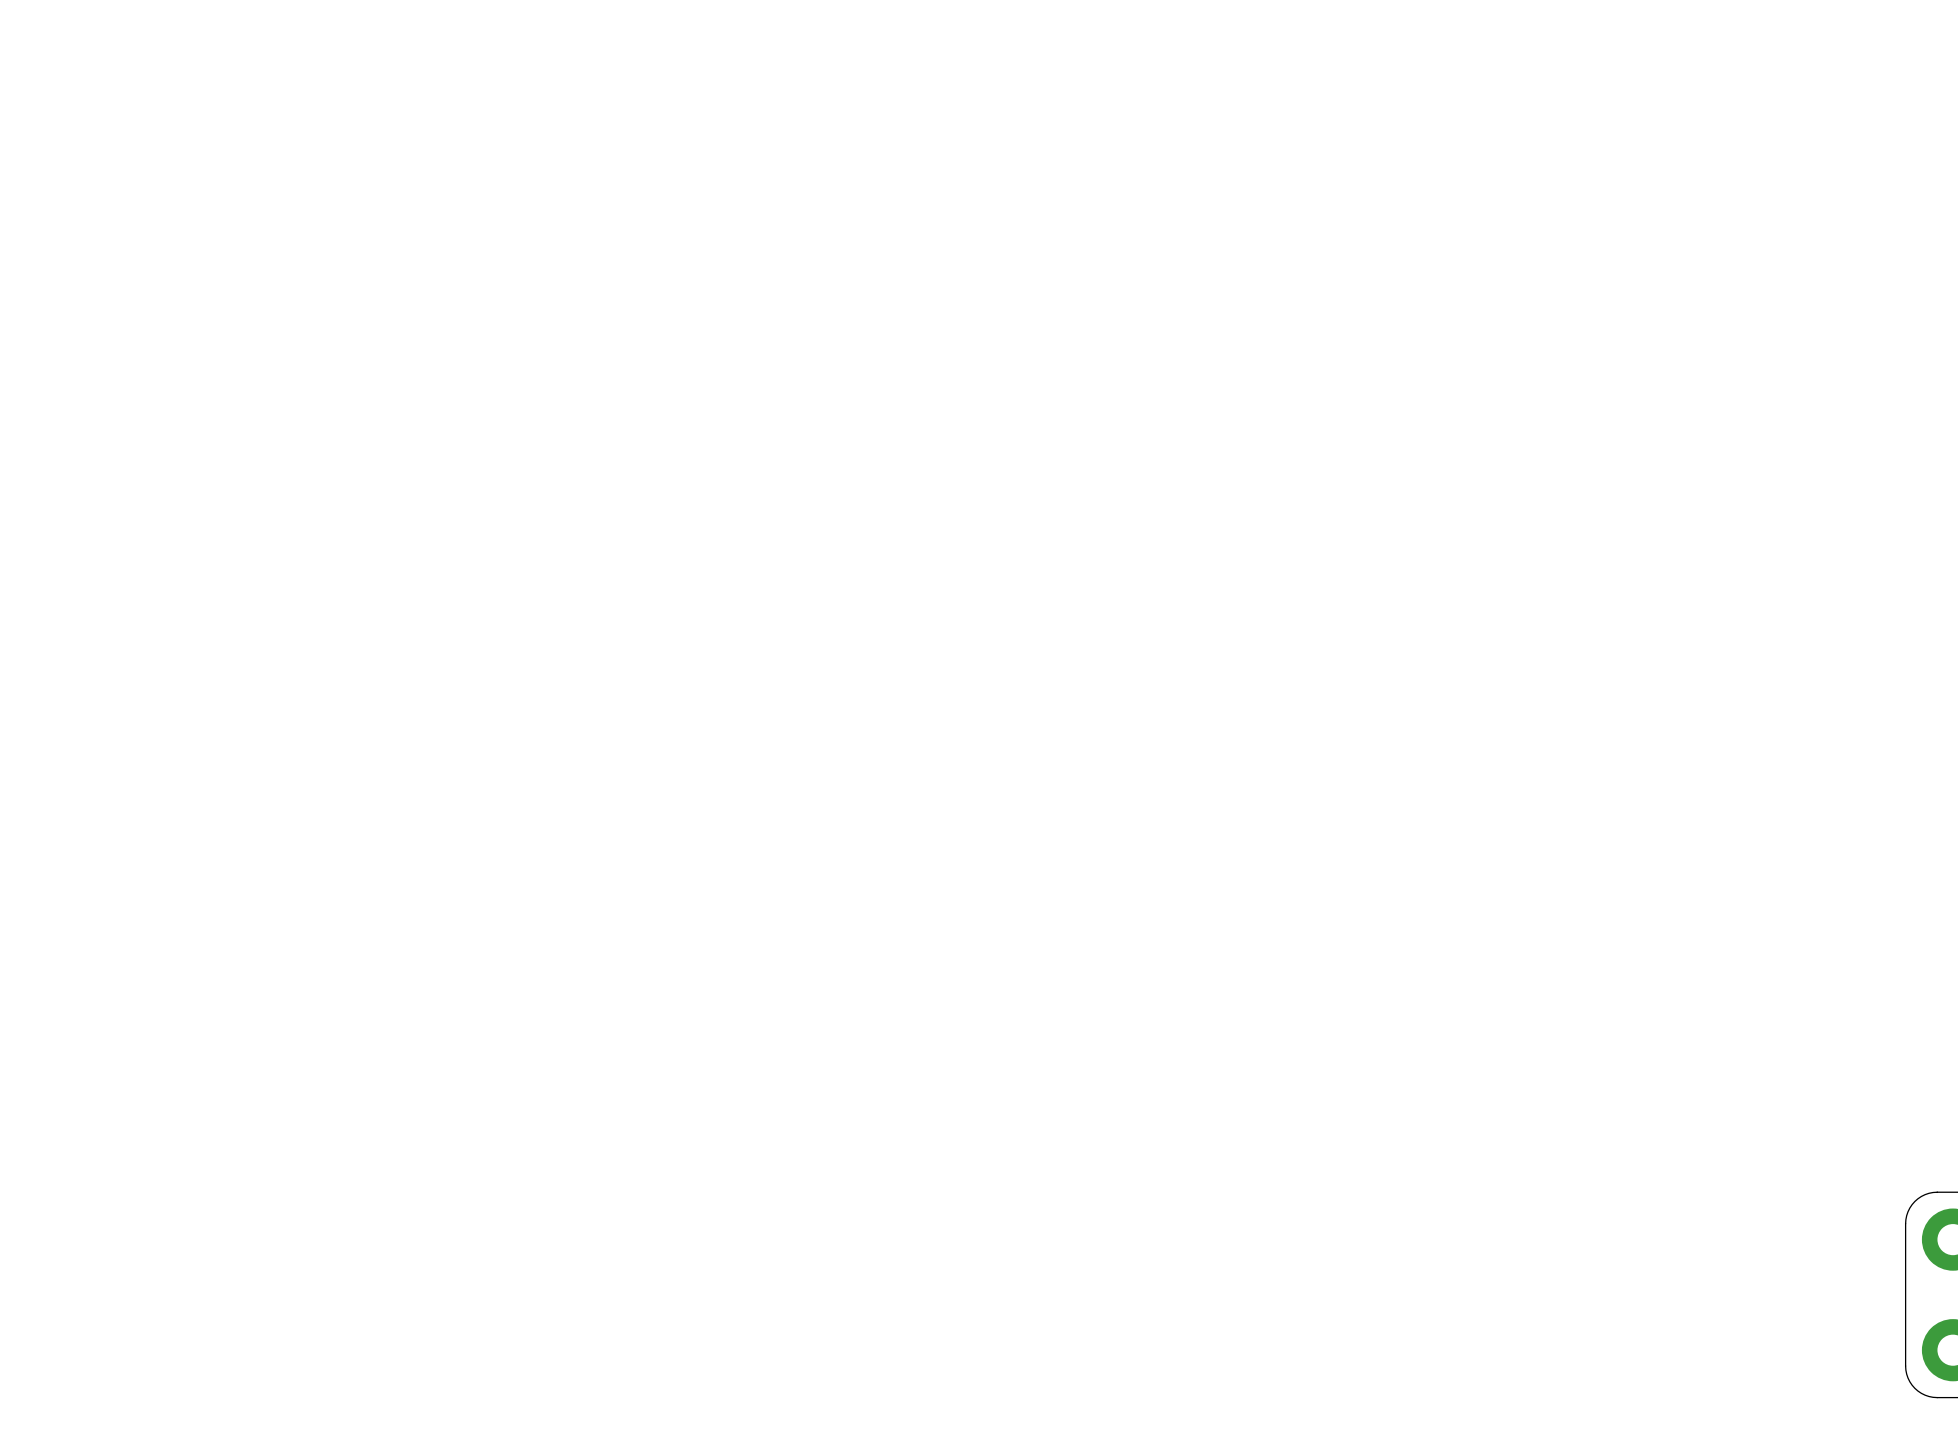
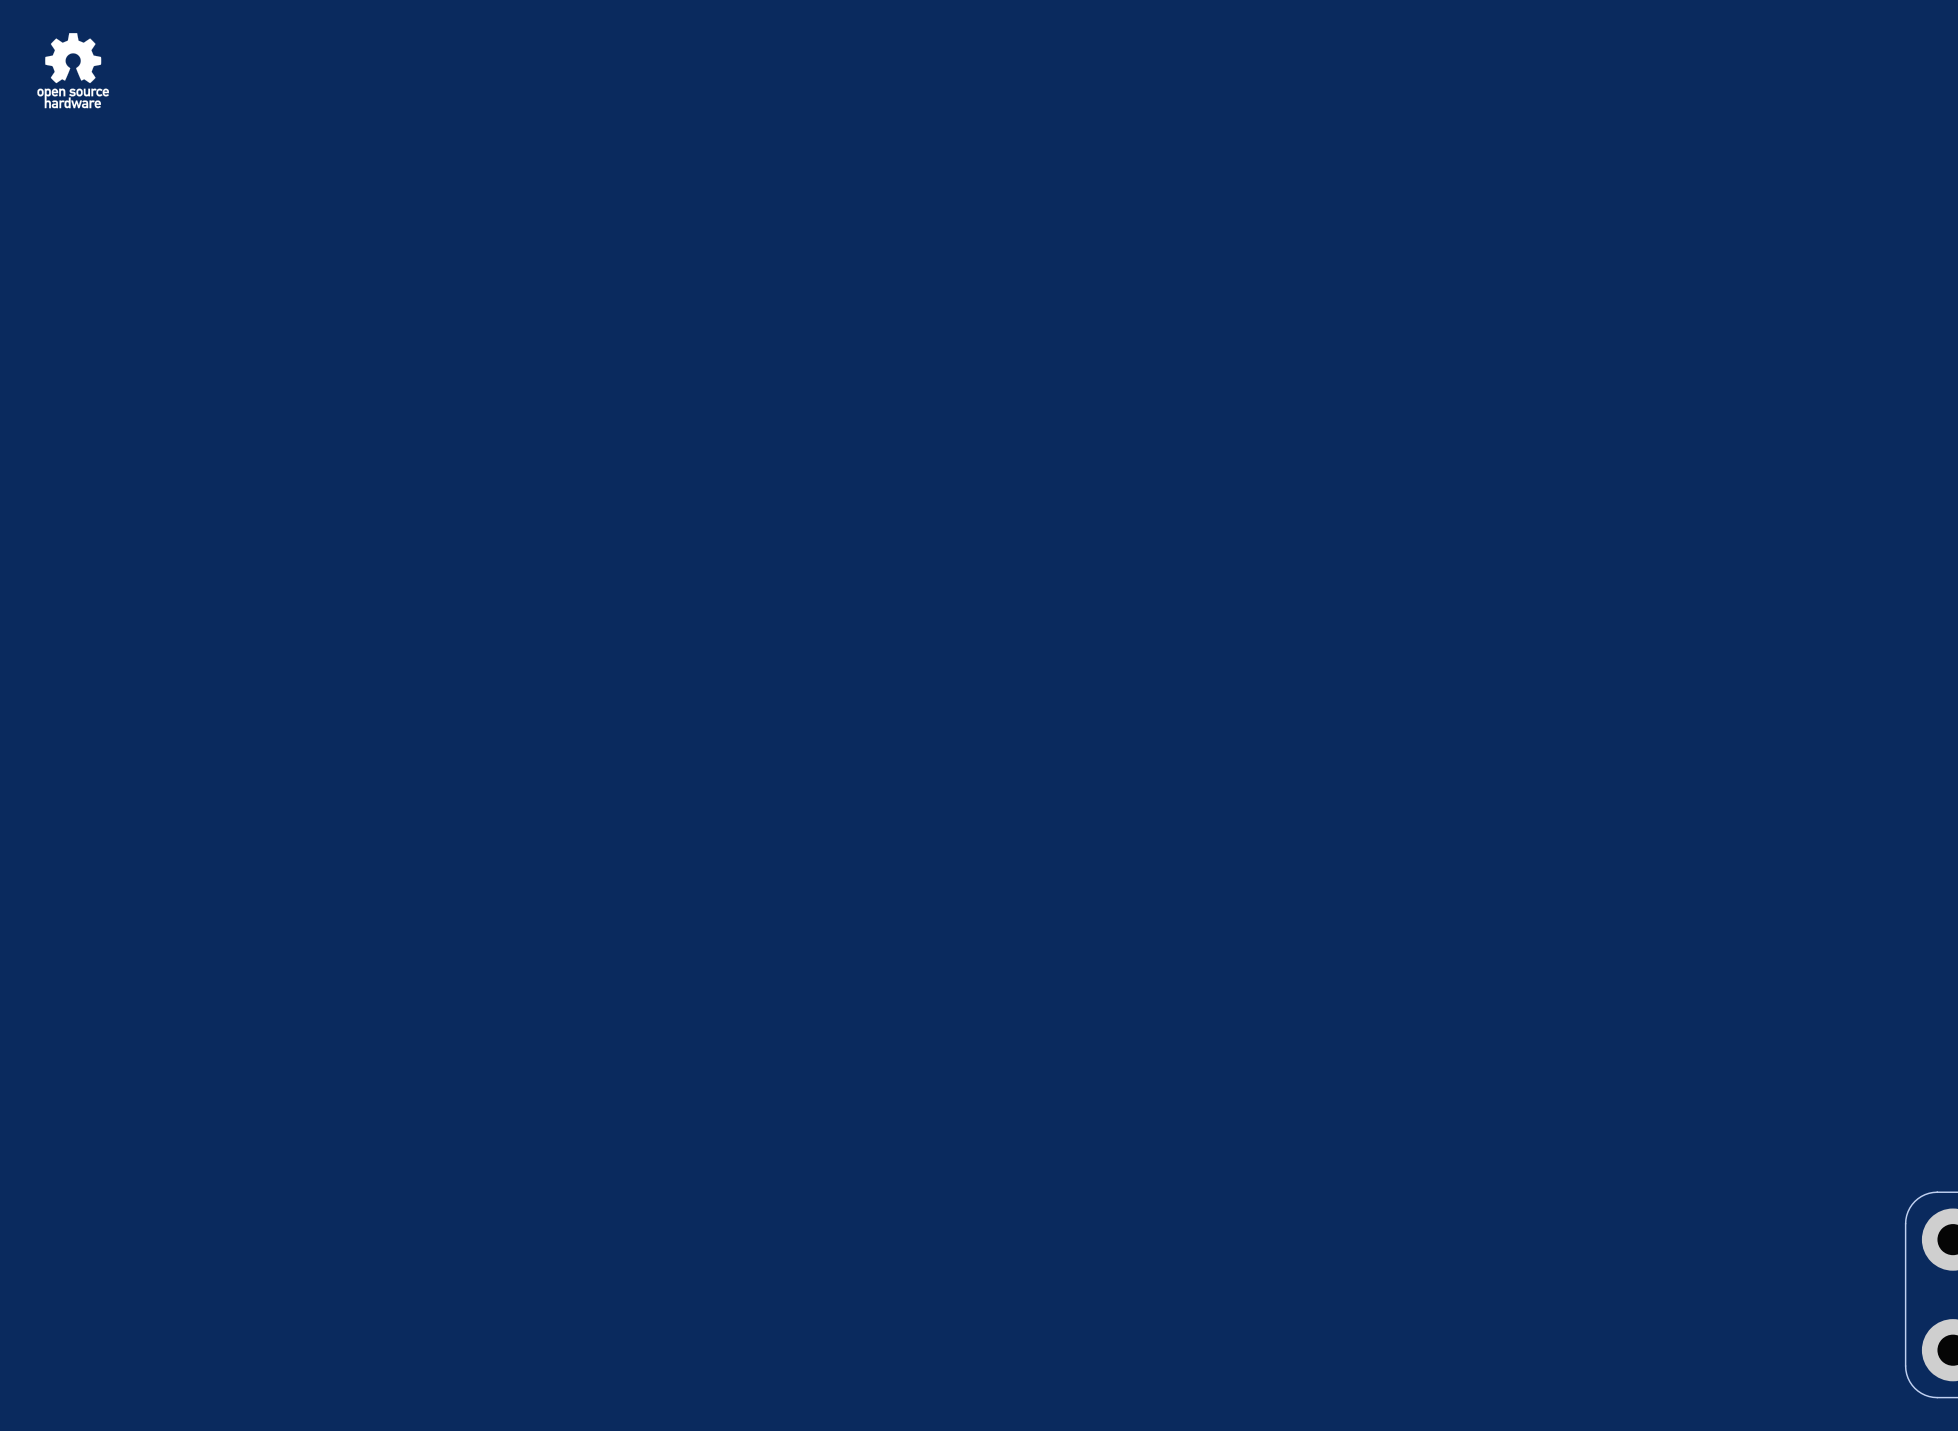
drawing: none -> [37, 33, 110, 109]

